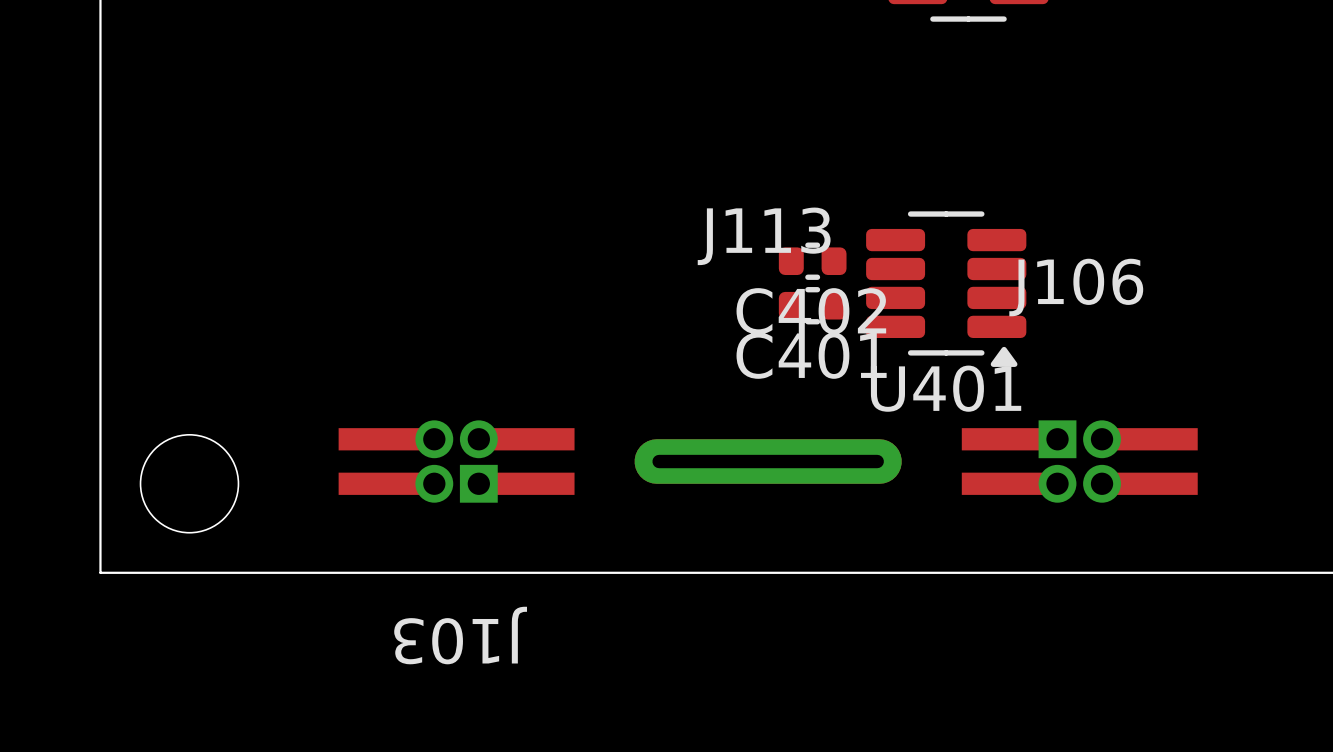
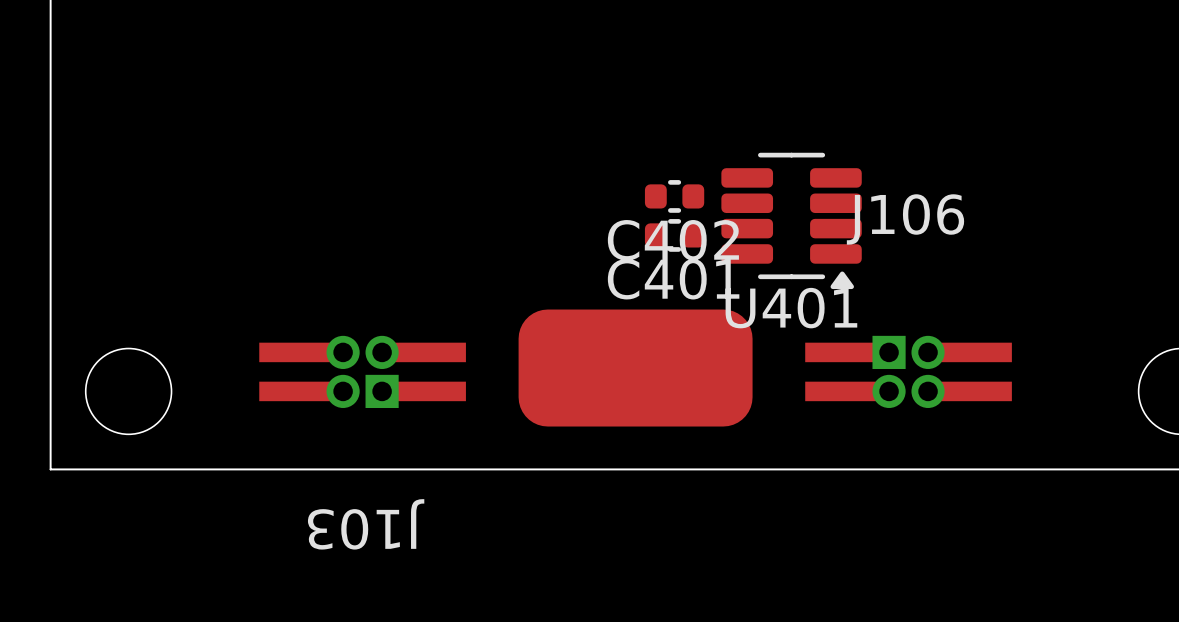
part: none -> (635, 368)
J113: (768, 461) -> none

